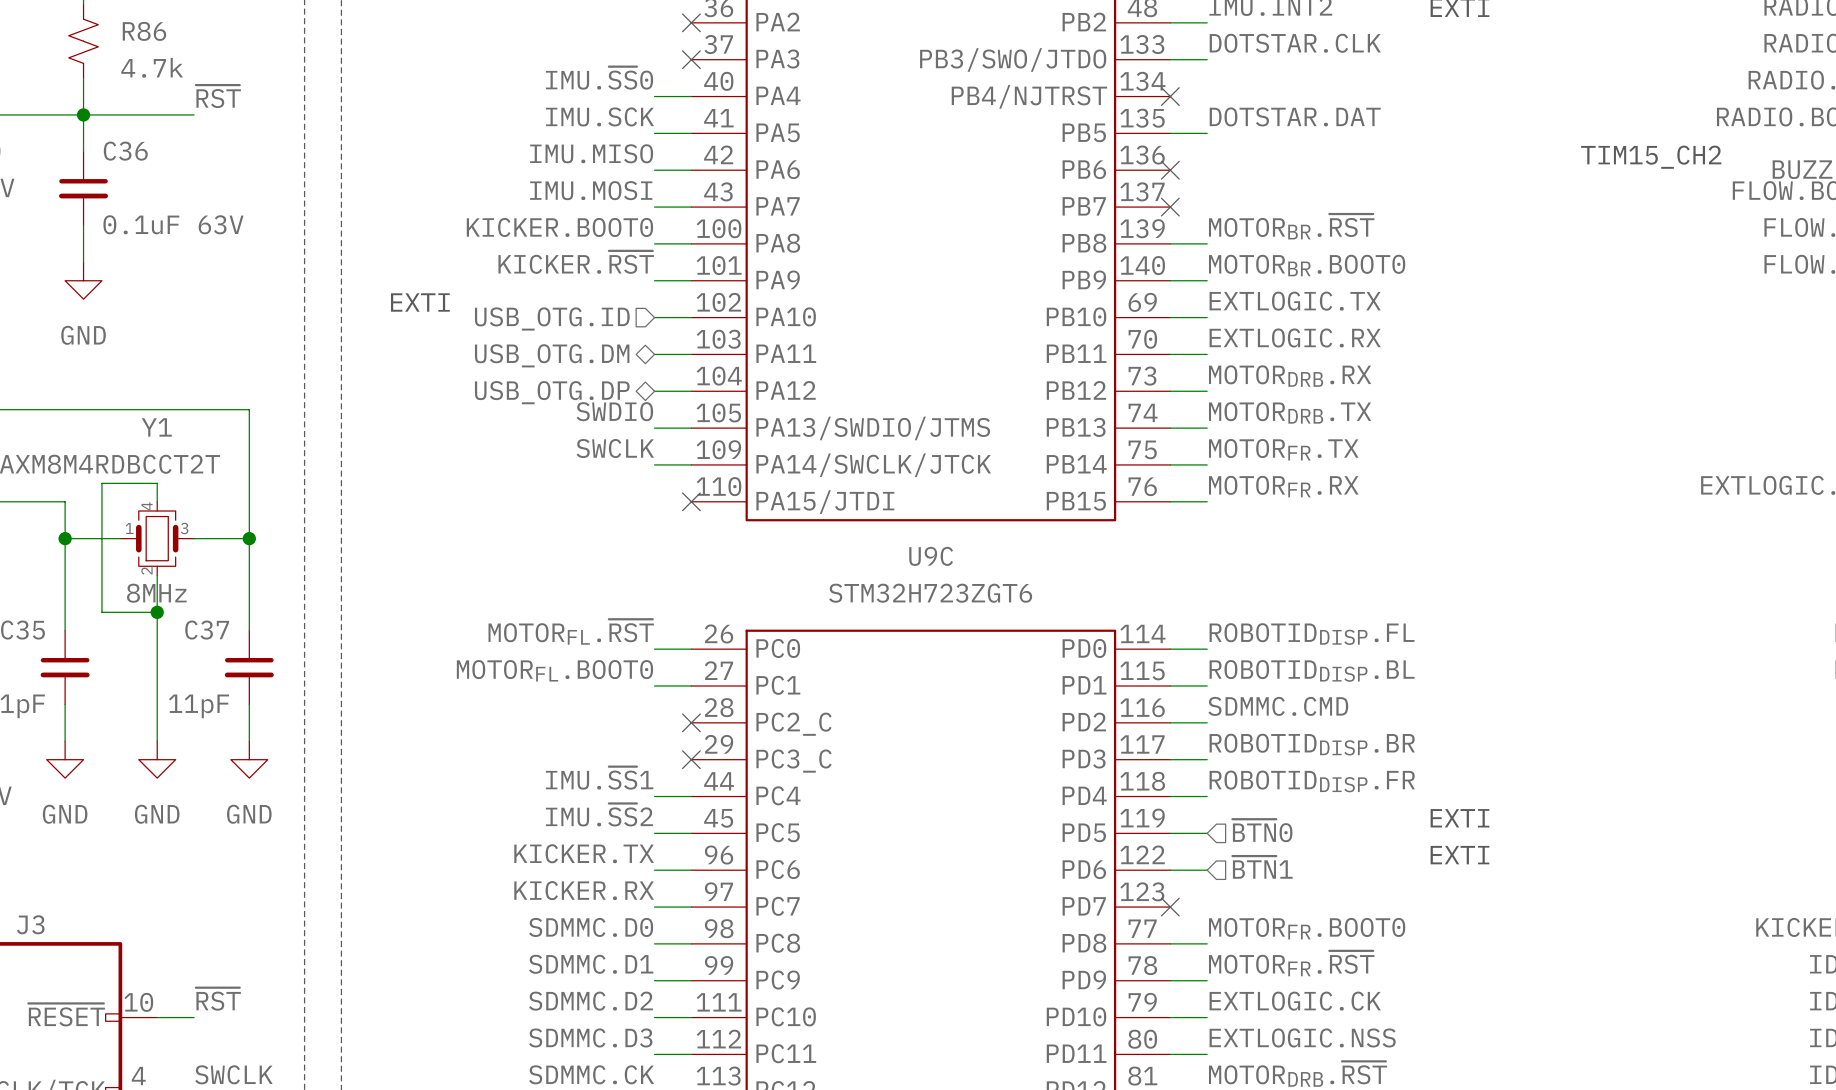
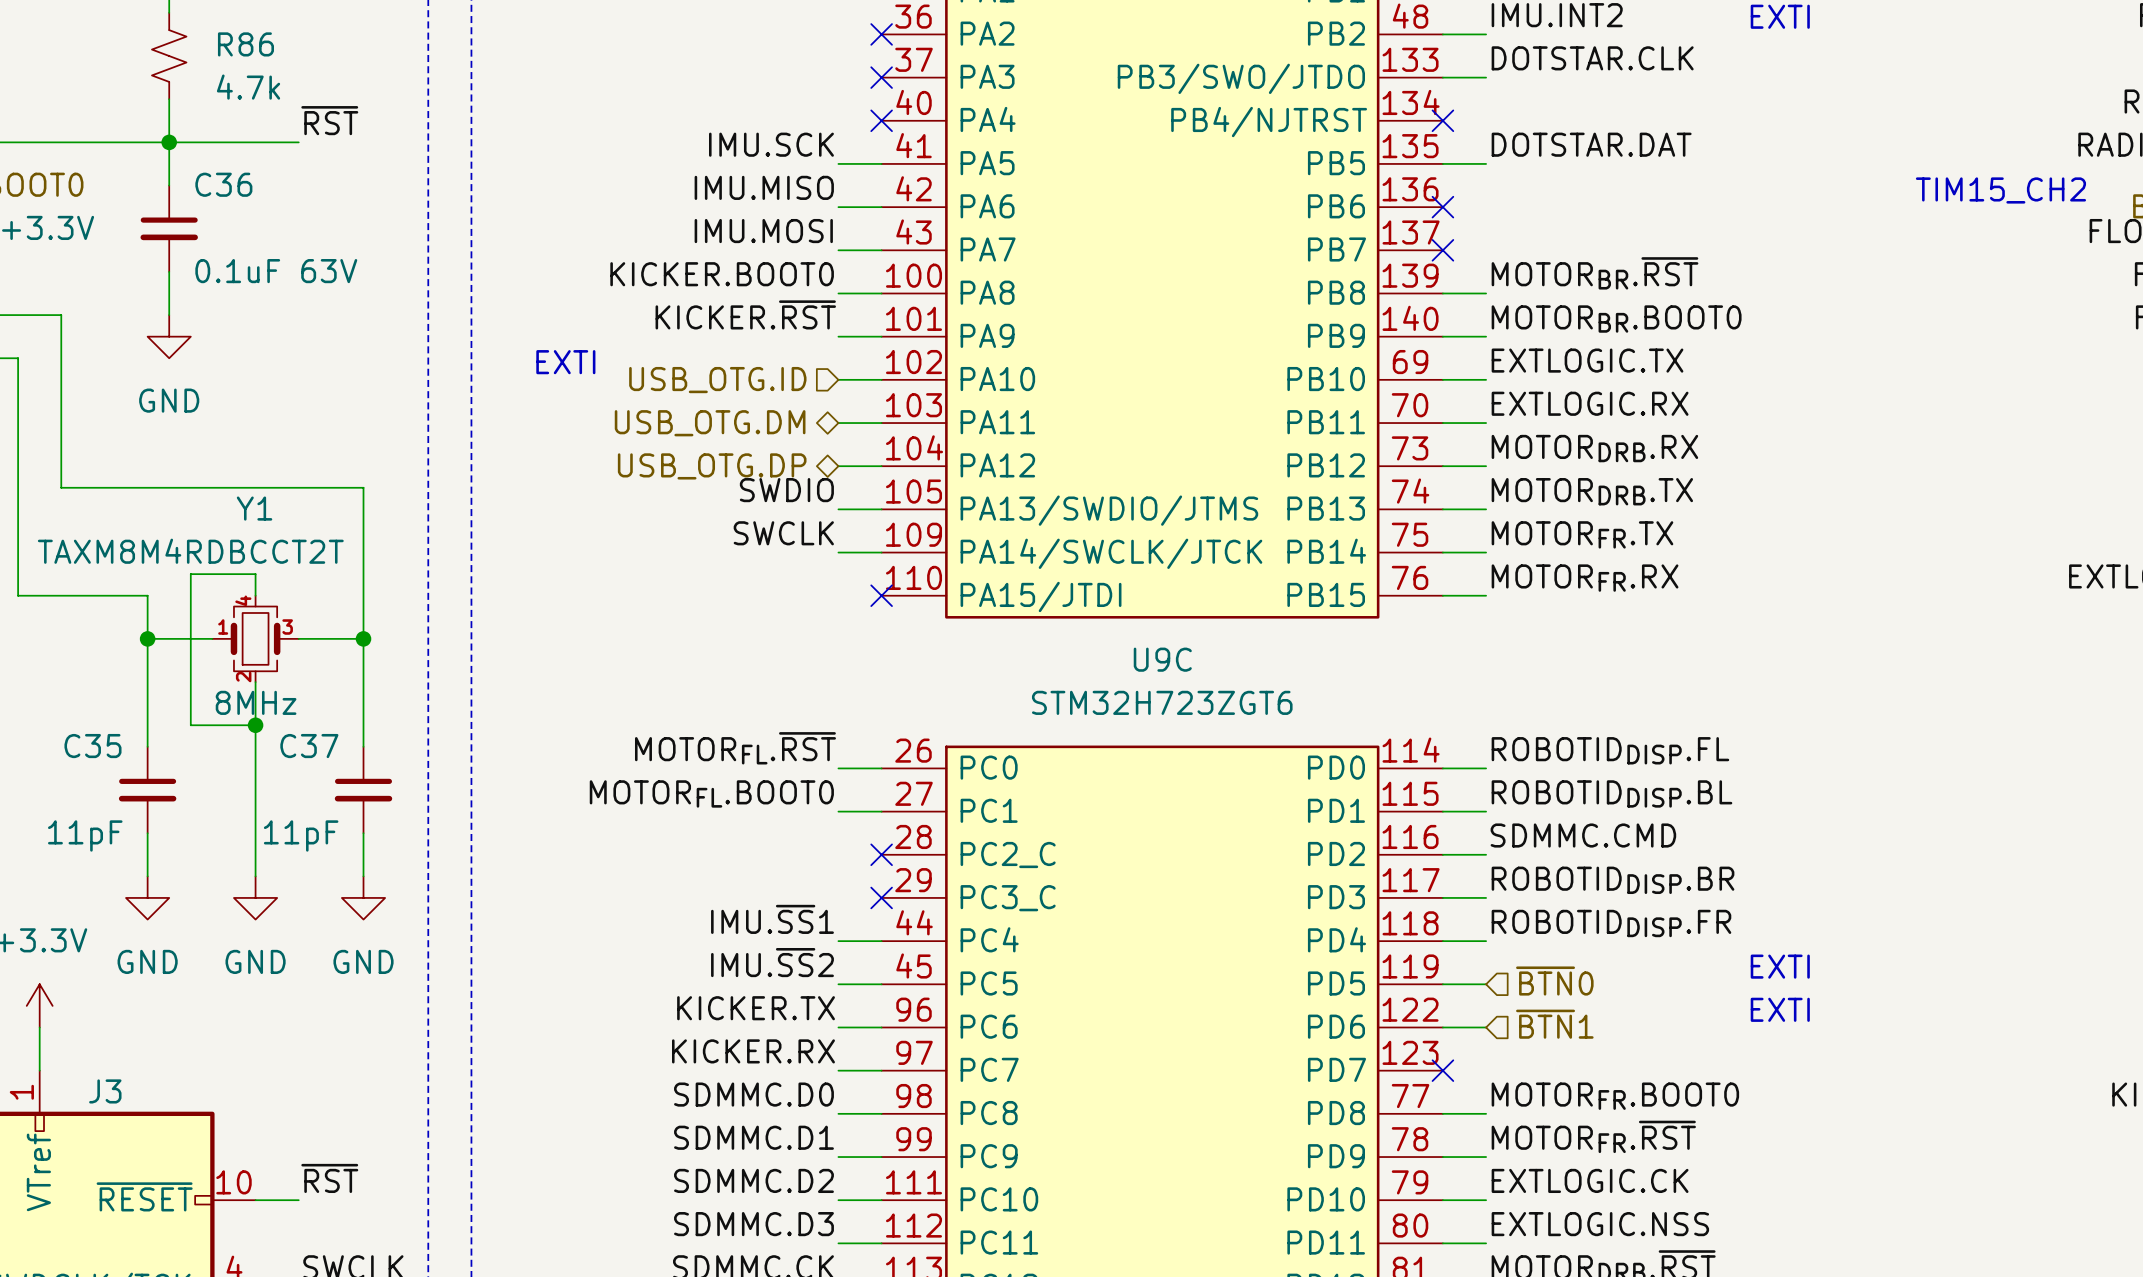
label: IMU.~{SS}0 (599, 78) -> none
wire: (654, 96) (691, 96) -> none
no-connect mark: none -> (881, 120)

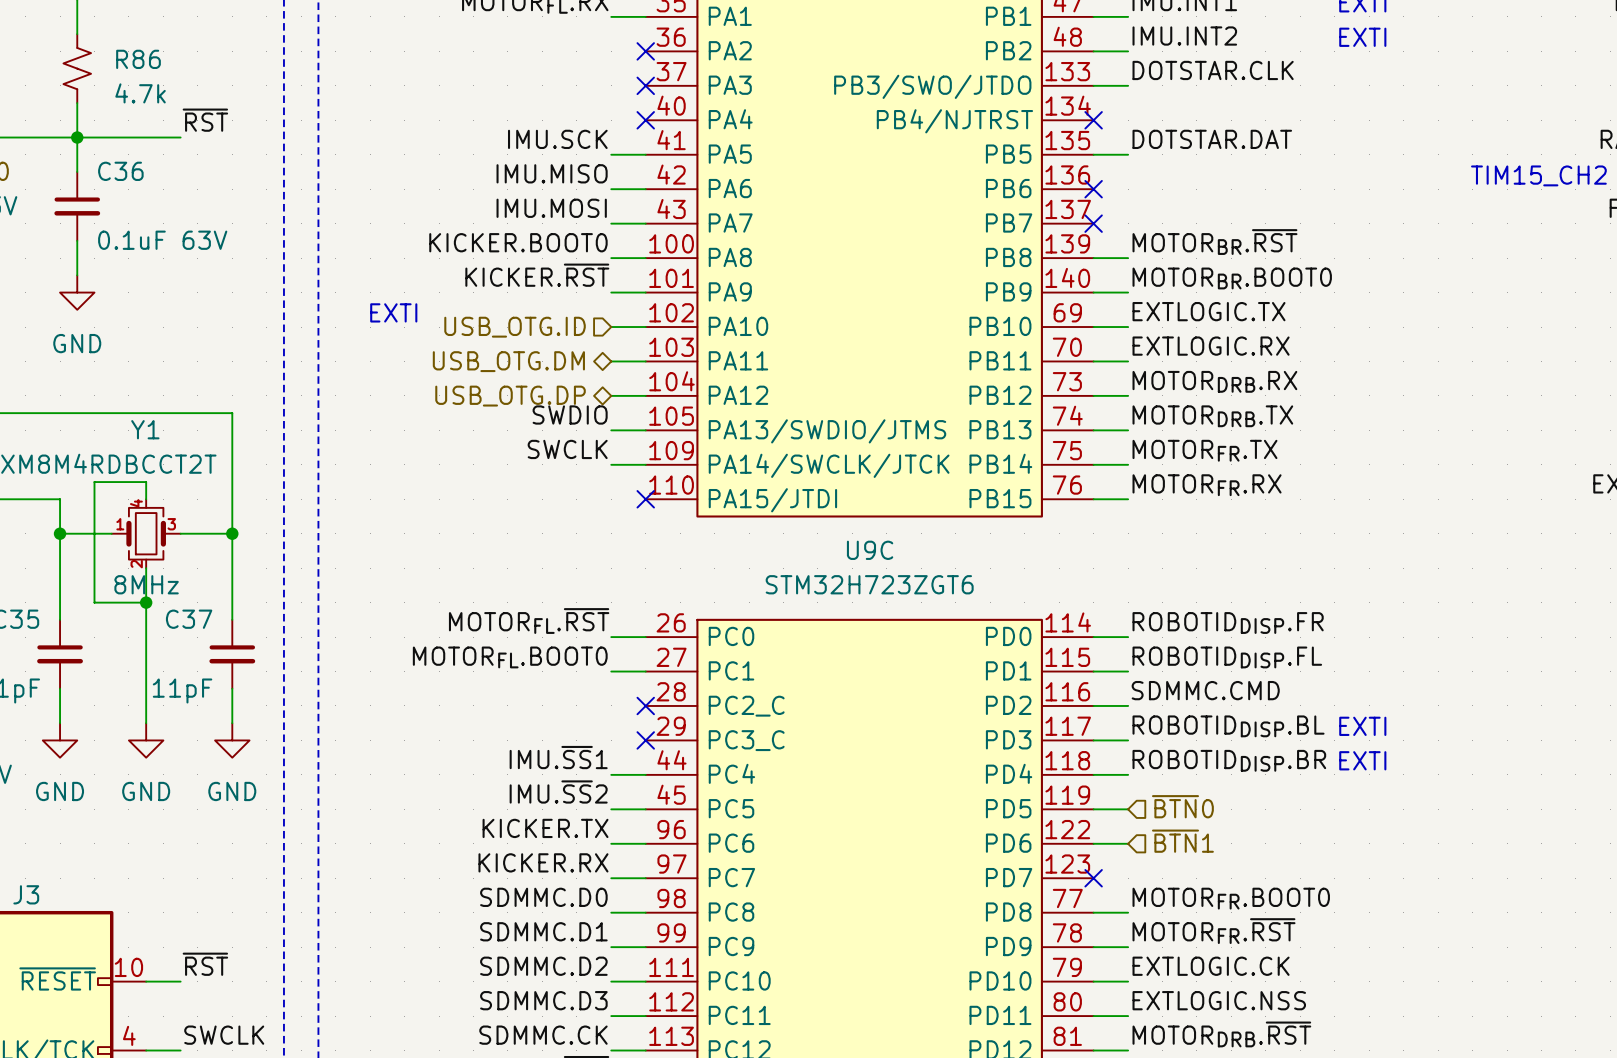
label: ROBOTIDDISP.FL (1610, 750) -> ROBOTIDDISP.FR (1228, 623)
label: ROBOTIDDISP.BL (1611, 793) -> ROBOTIDDISP.FL (1227, 657)
label: ROBOTIDDISP.BR (1613, 880) -> ROBOTIDDISP.BL (1228, 726)
text: none -> EXTI (1362, 726)
label: ROBOTIDDISP.FR (1611, 923) -> ROBOTIDDISP.BR (1229, 760)
text position: EXTI (1780, 966) -> EXTI (1362, 760)
text: EXTI (1780, 1009) -> none

